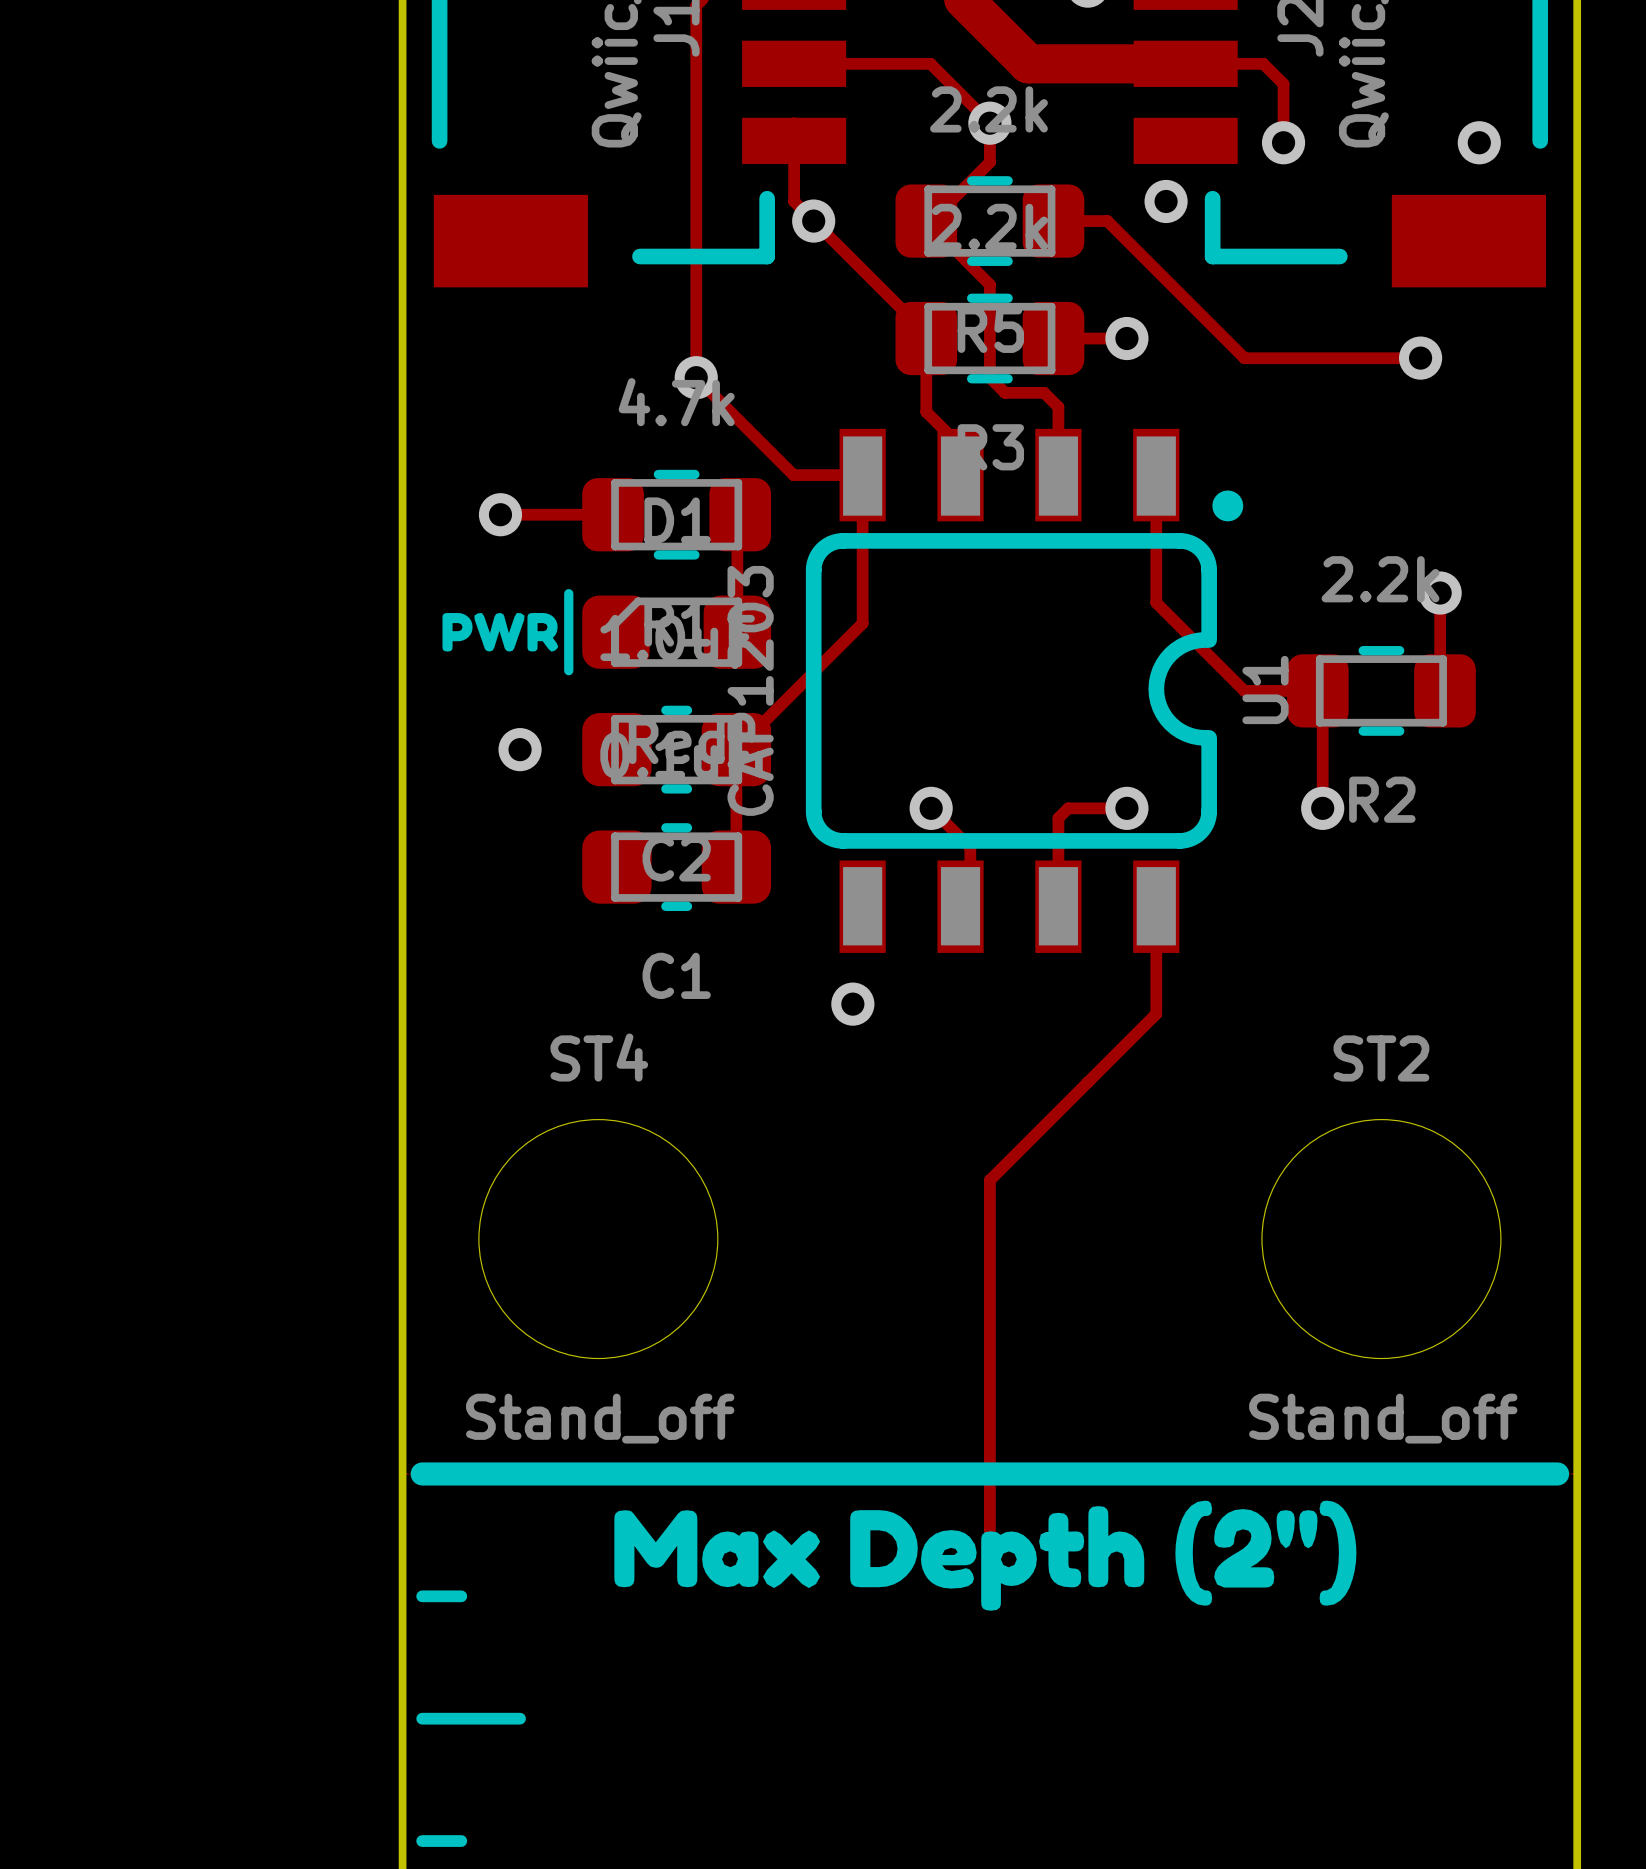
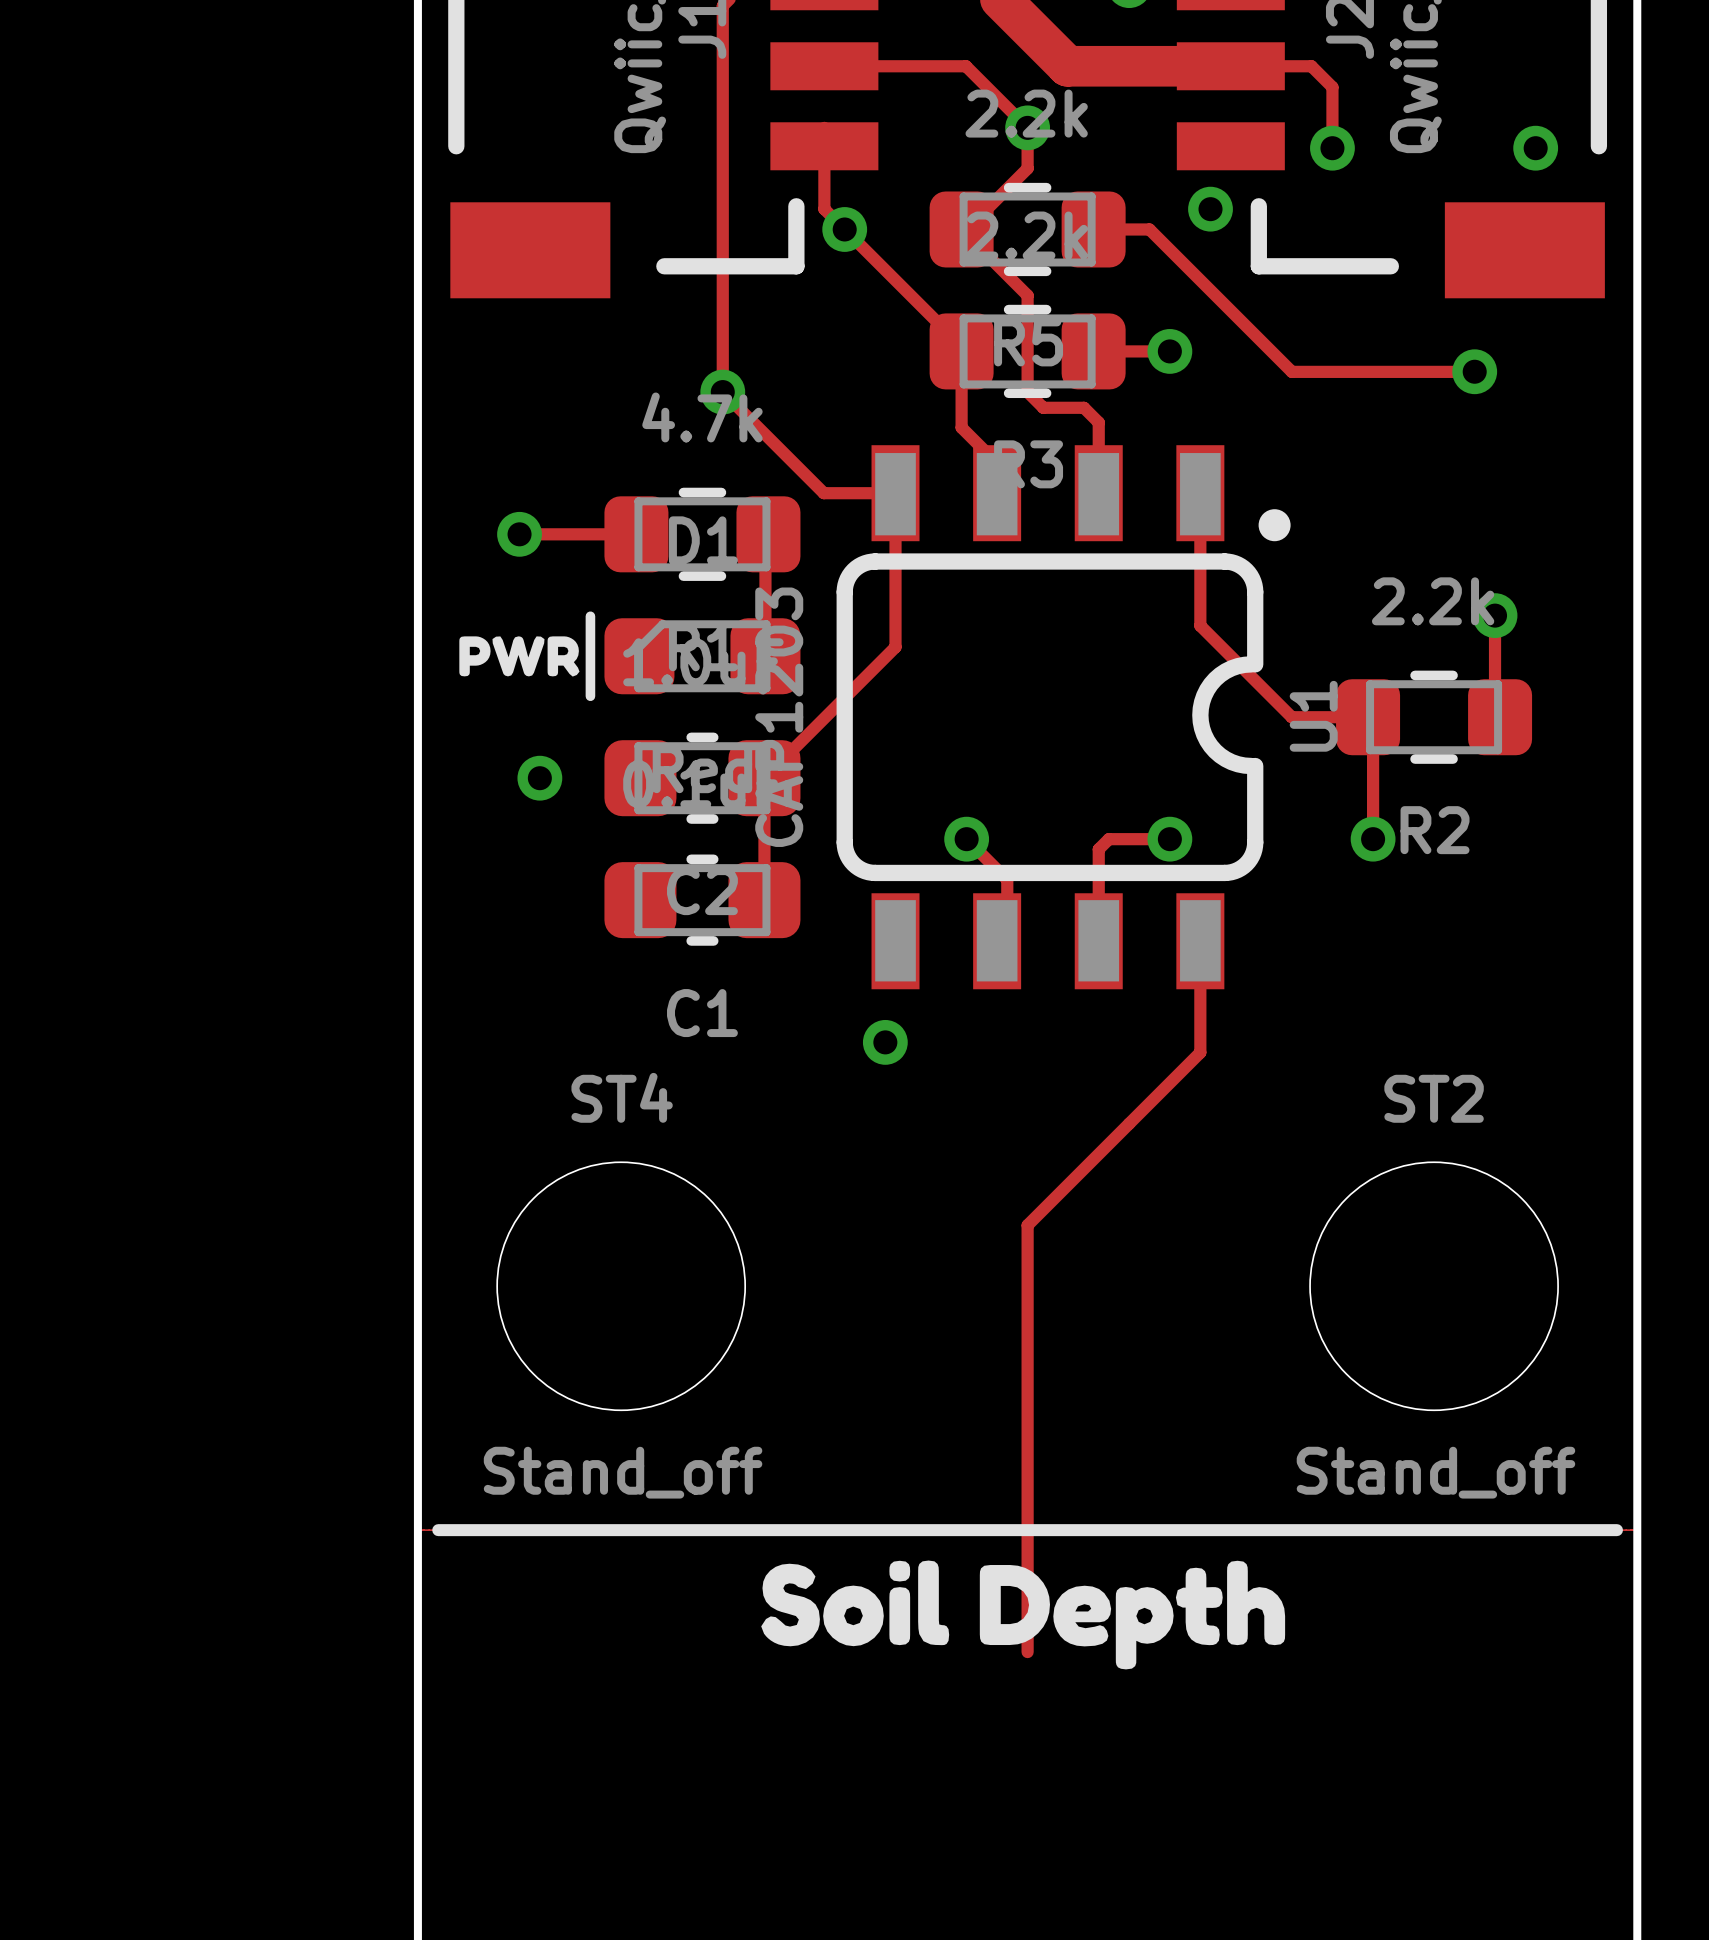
line width: thick (422, 1473) (1557, 1473) -> thin (438, 1530) (1616, 1530)
drawing shape: [614, 1500, 1357, 1611] -> [761, 1560, 1286, 1670]
line: (422, 1596) (461, 1596) -> none
line: (422, 1718) (520, 1718) -> none
line: (422, 1841) (461, 1841) -> none

